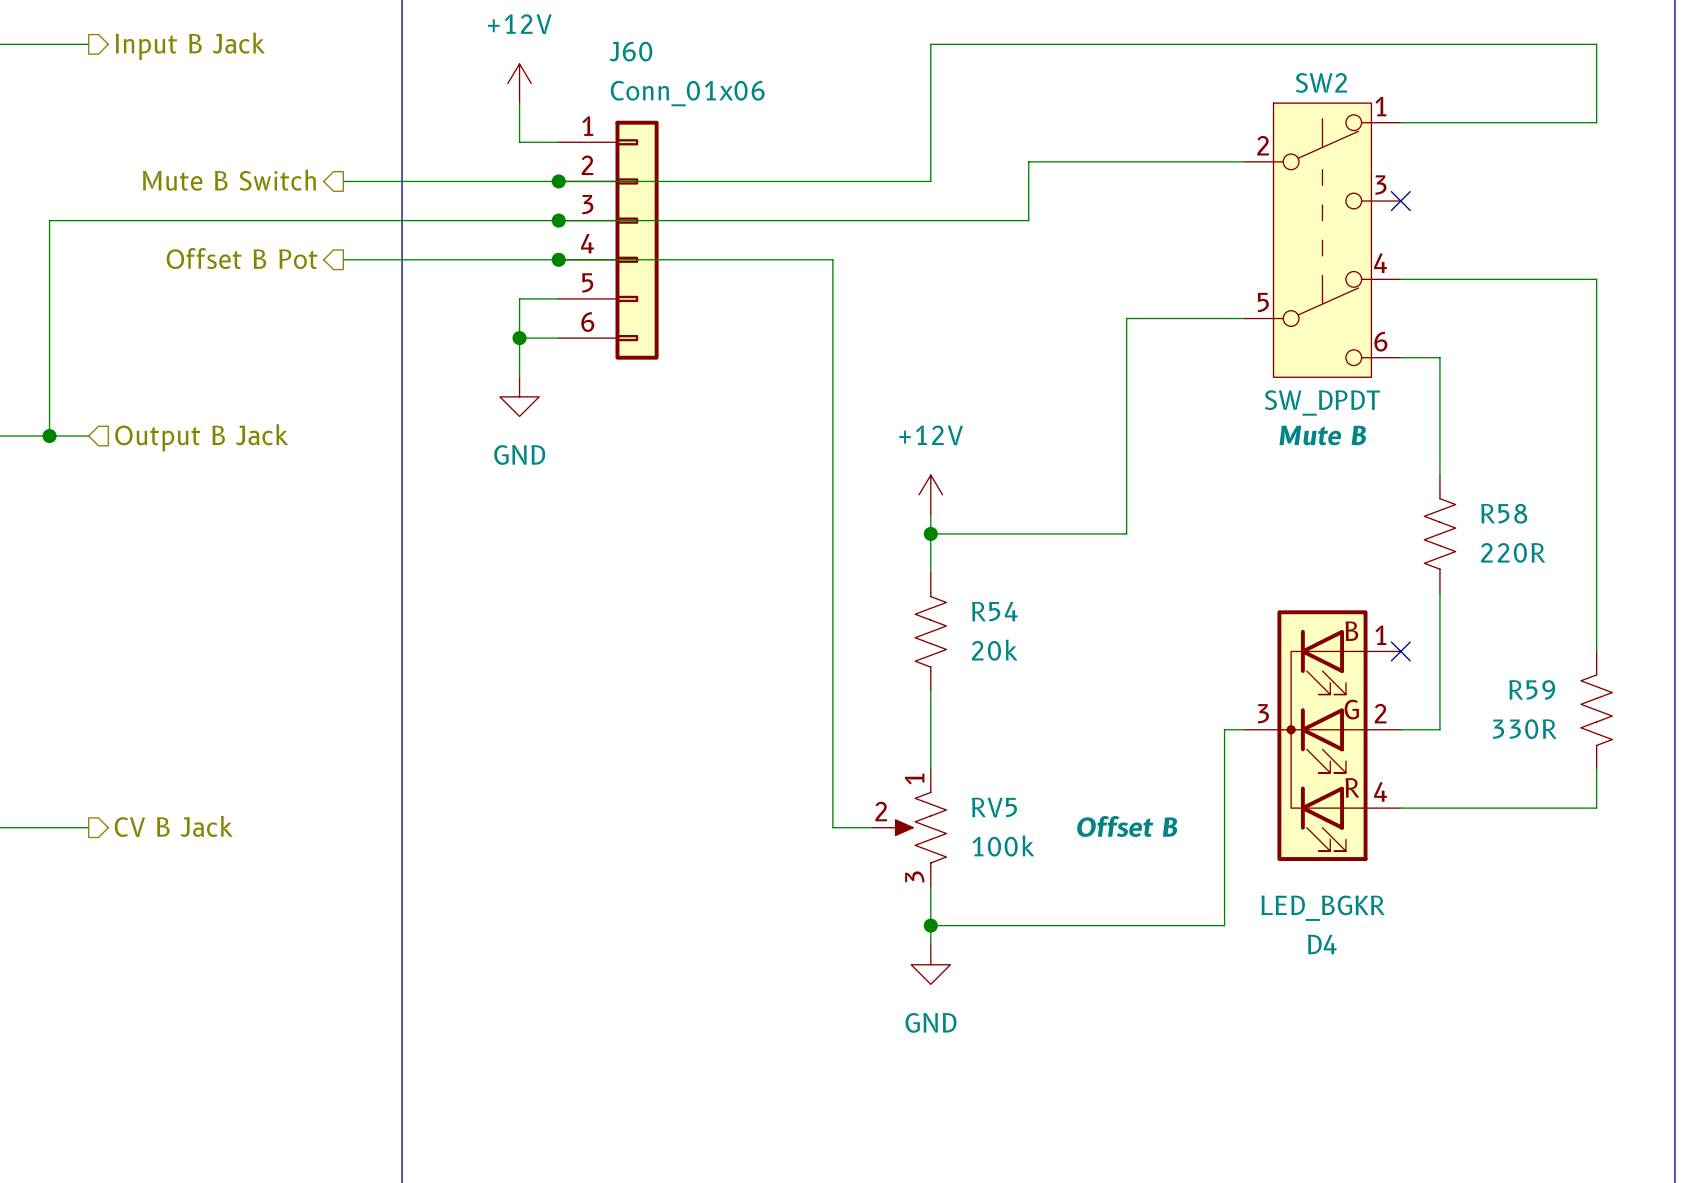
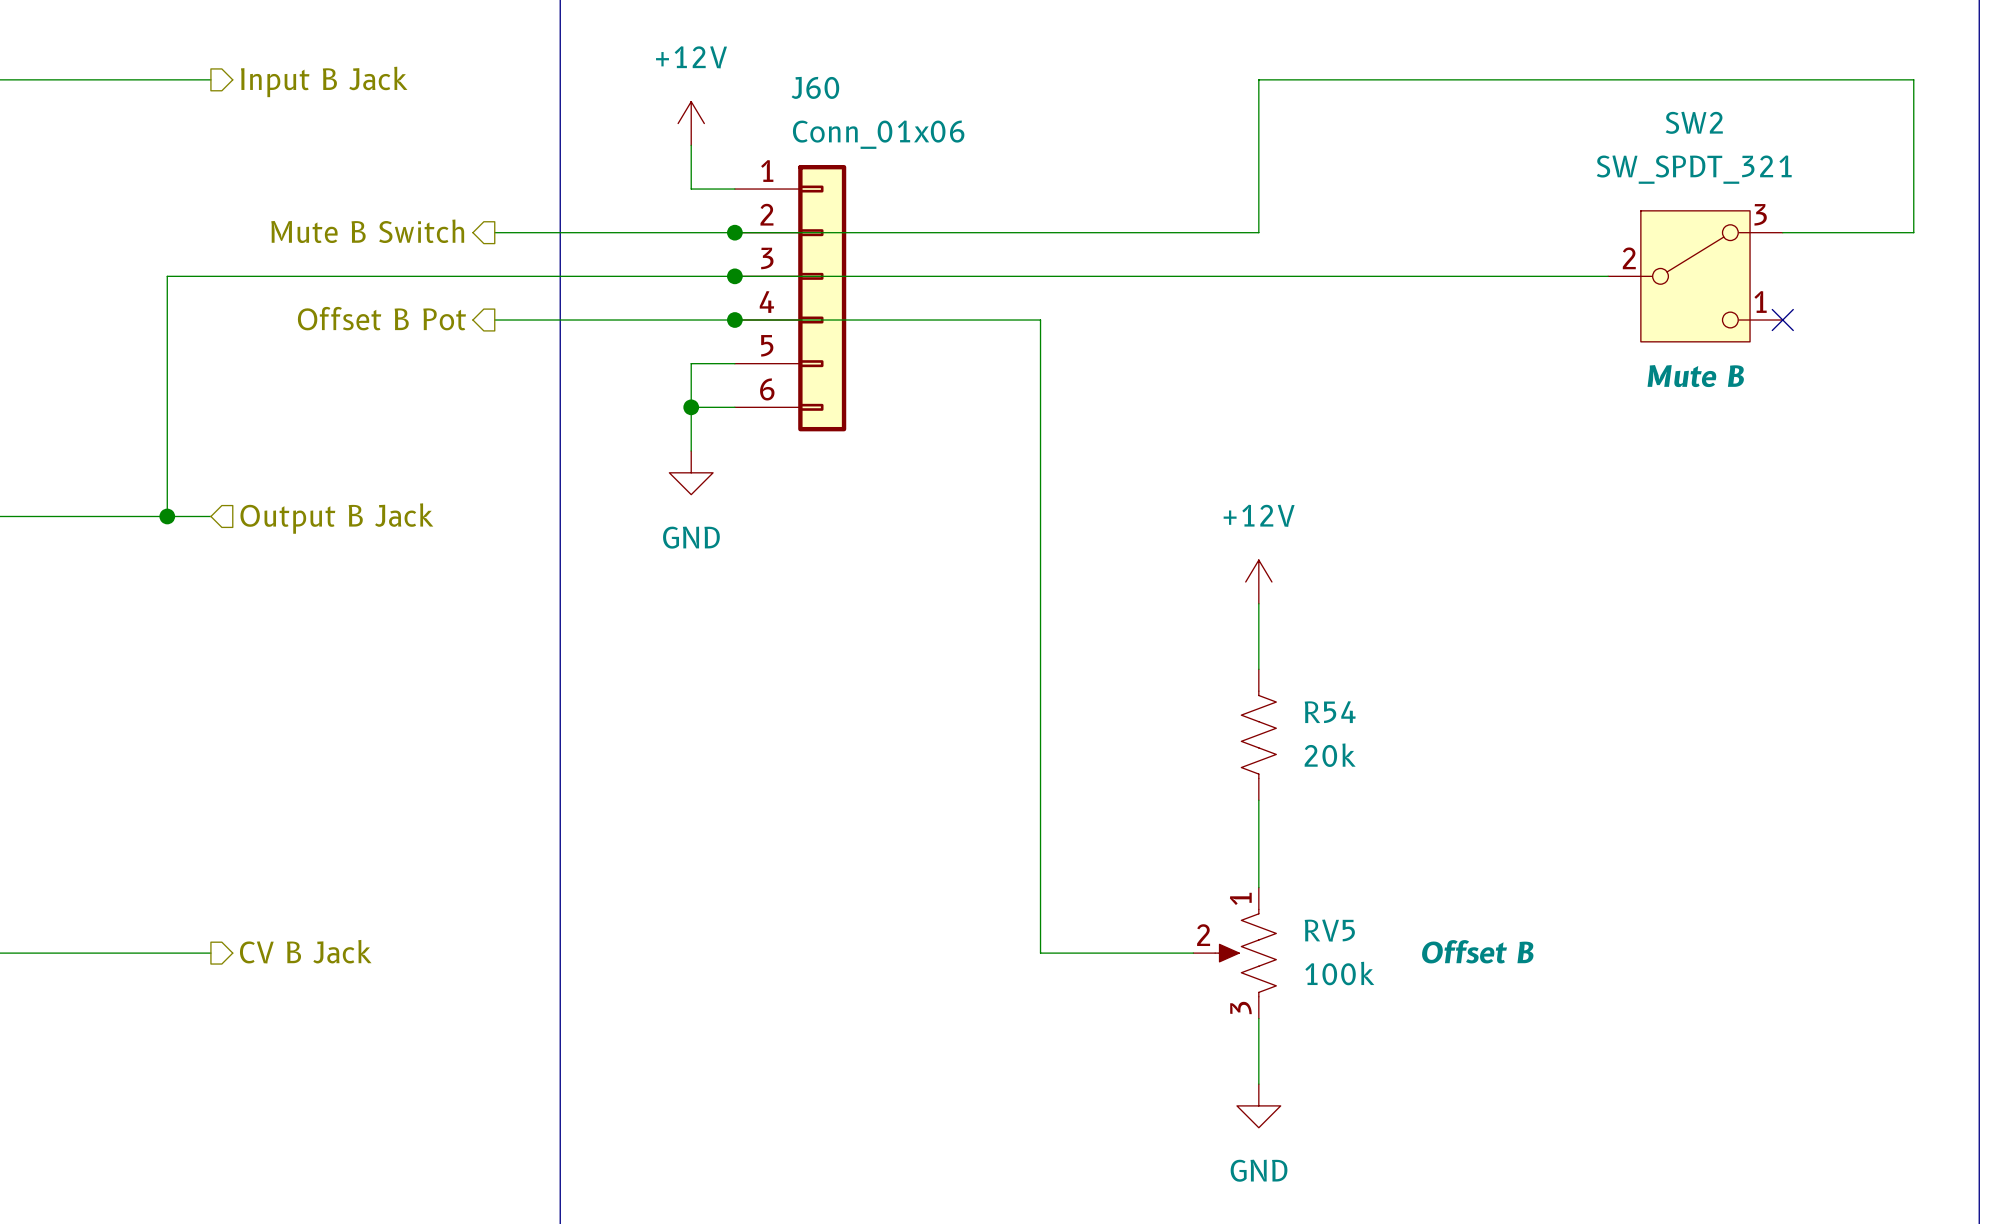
wire: (1028, 44) (930, 44) (930, 181) -> (1258, 79) (1258, 210)
wire: (1596, 44) (1596, 122) (1400, 122) -> (1891, 79) (1913, 79) (1913, 232) (1782, 232)
SW2 symbol: [1244, 103, 1401, 378] -> [1608, 210, 1783, 342]
wire: (1028, 161) (1244, 161) -> none
wire: (1028, 181) (1028, 220) -> (1258, 232) (1149, 232)
no-connect mark: (1400, 201) -> none
wire: none -> (1258, 276) (1608, 276)
no-connect mark: none -> (1782, 320)
wire: (1400, 279) (1596, 279) (1596, 651) -> none
wire: (1244, 318) (1126, 318) (1126, 533) (930, 533) -> none
wire: (1400, 357) (1439, 357) (1439, 475) -> none
SW2 value: SW_DPDT (1322, 402) -> SW_SPDT_321 (1694, 169)
SW2 text position: Mute B (1322, 435) -> Mute B (1695, 376)
power symbol position: +12V (930, 494) -> +12V (1258, 581)
wire: (930, 514) (930, 573) -> (1258, 603) (1258, 669)
junction: (930, 533) -> none
R58: 220R (1439, 533) -> none
wire: (1439, 592) (1439, 729) (1400, 729) -> none
R54 position: (930, 631) -> (1258, 734)
no-connect mark: (1400, 651) -> none
wire: (930, 690) (930, 768) -> (1258, 800) (1258, 887)
R59: 330R (1596, 710) -> none
wire: (1244, 729) (1224, 729) (1224, 925) (930, 925) -> none
D4: LED_BGKR (1322, 735) -> none
wire: (1596, 768) (1596, 808) (1400, 808) -> none
wire: none -> (1084, 953) (1193, 953)
RV5 position: (909, 827) -> (1234, 953)
wire: (930, 886) (930, 945) -> (1258, 1018) (1258, 1084)
junction: (930, 925) -> none
power symbol position: GND (930, 964) -> GND (1258, 1105)

